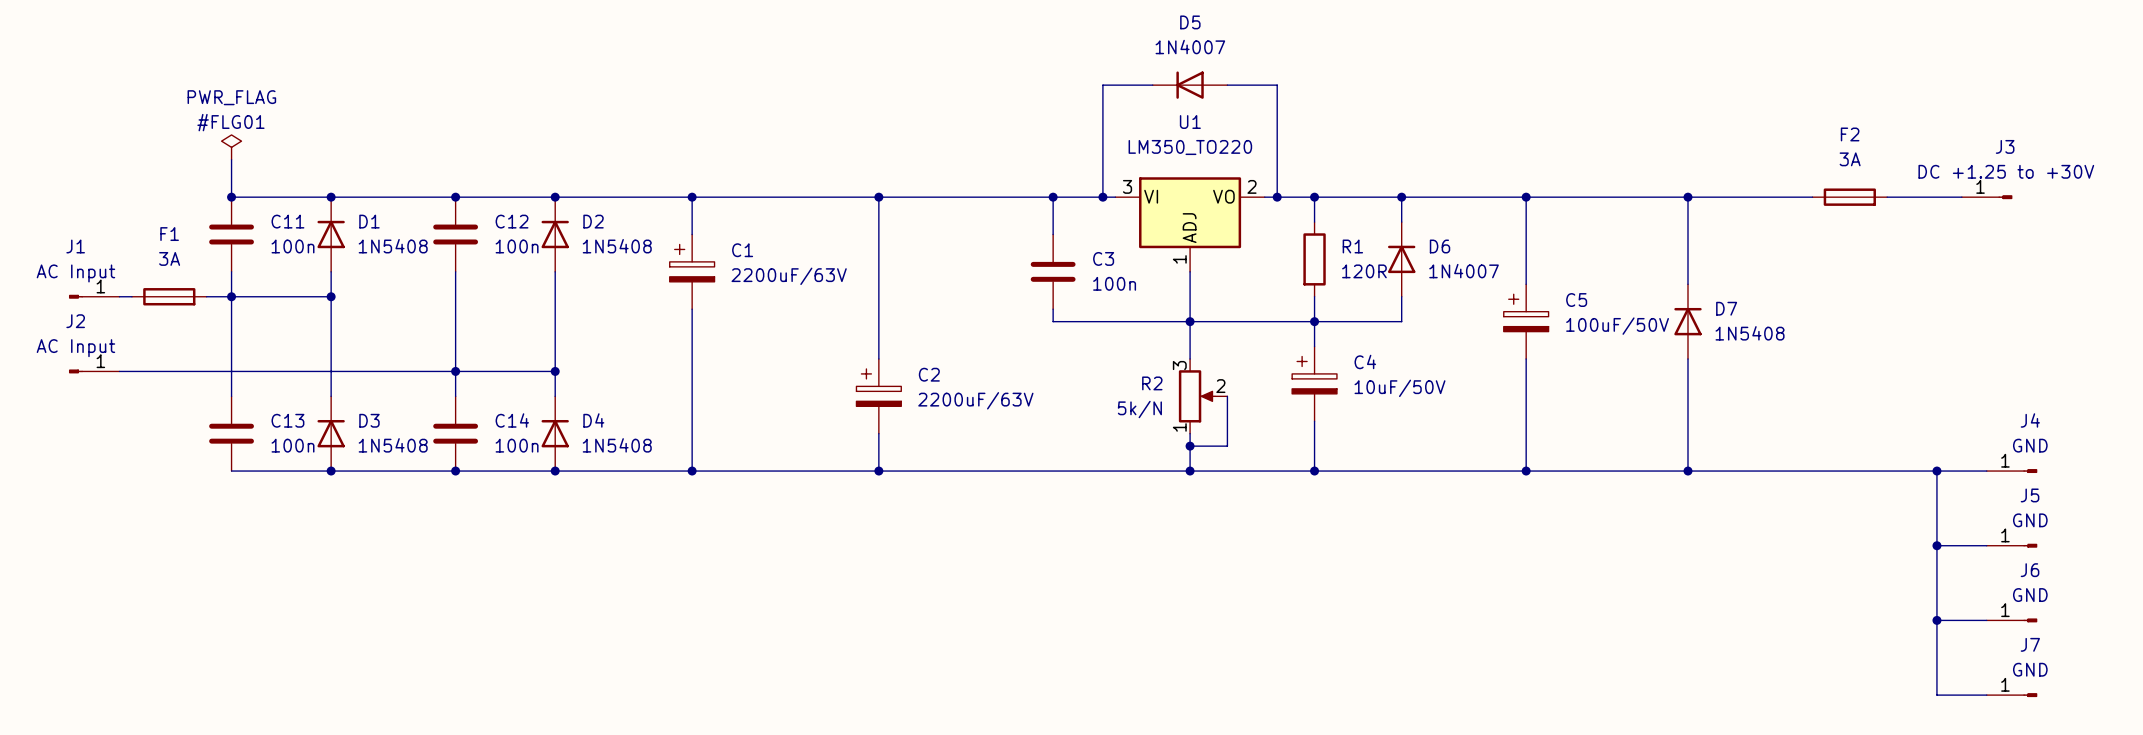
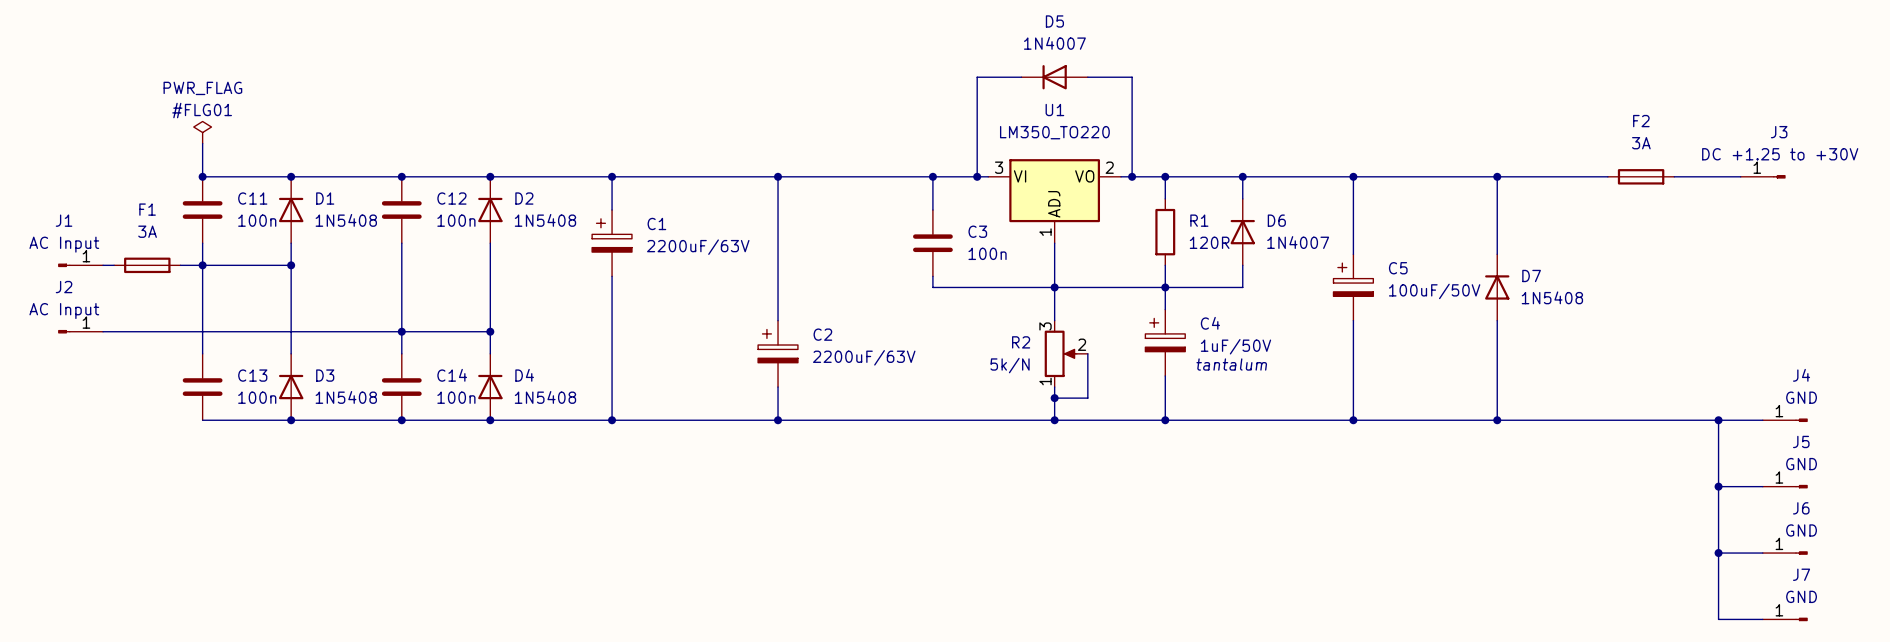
C4 value: 10uF/50V (1400, 388) -> 1uF/50V (1235, 346)
C4 text: none -> tantalum (1231, 364)

